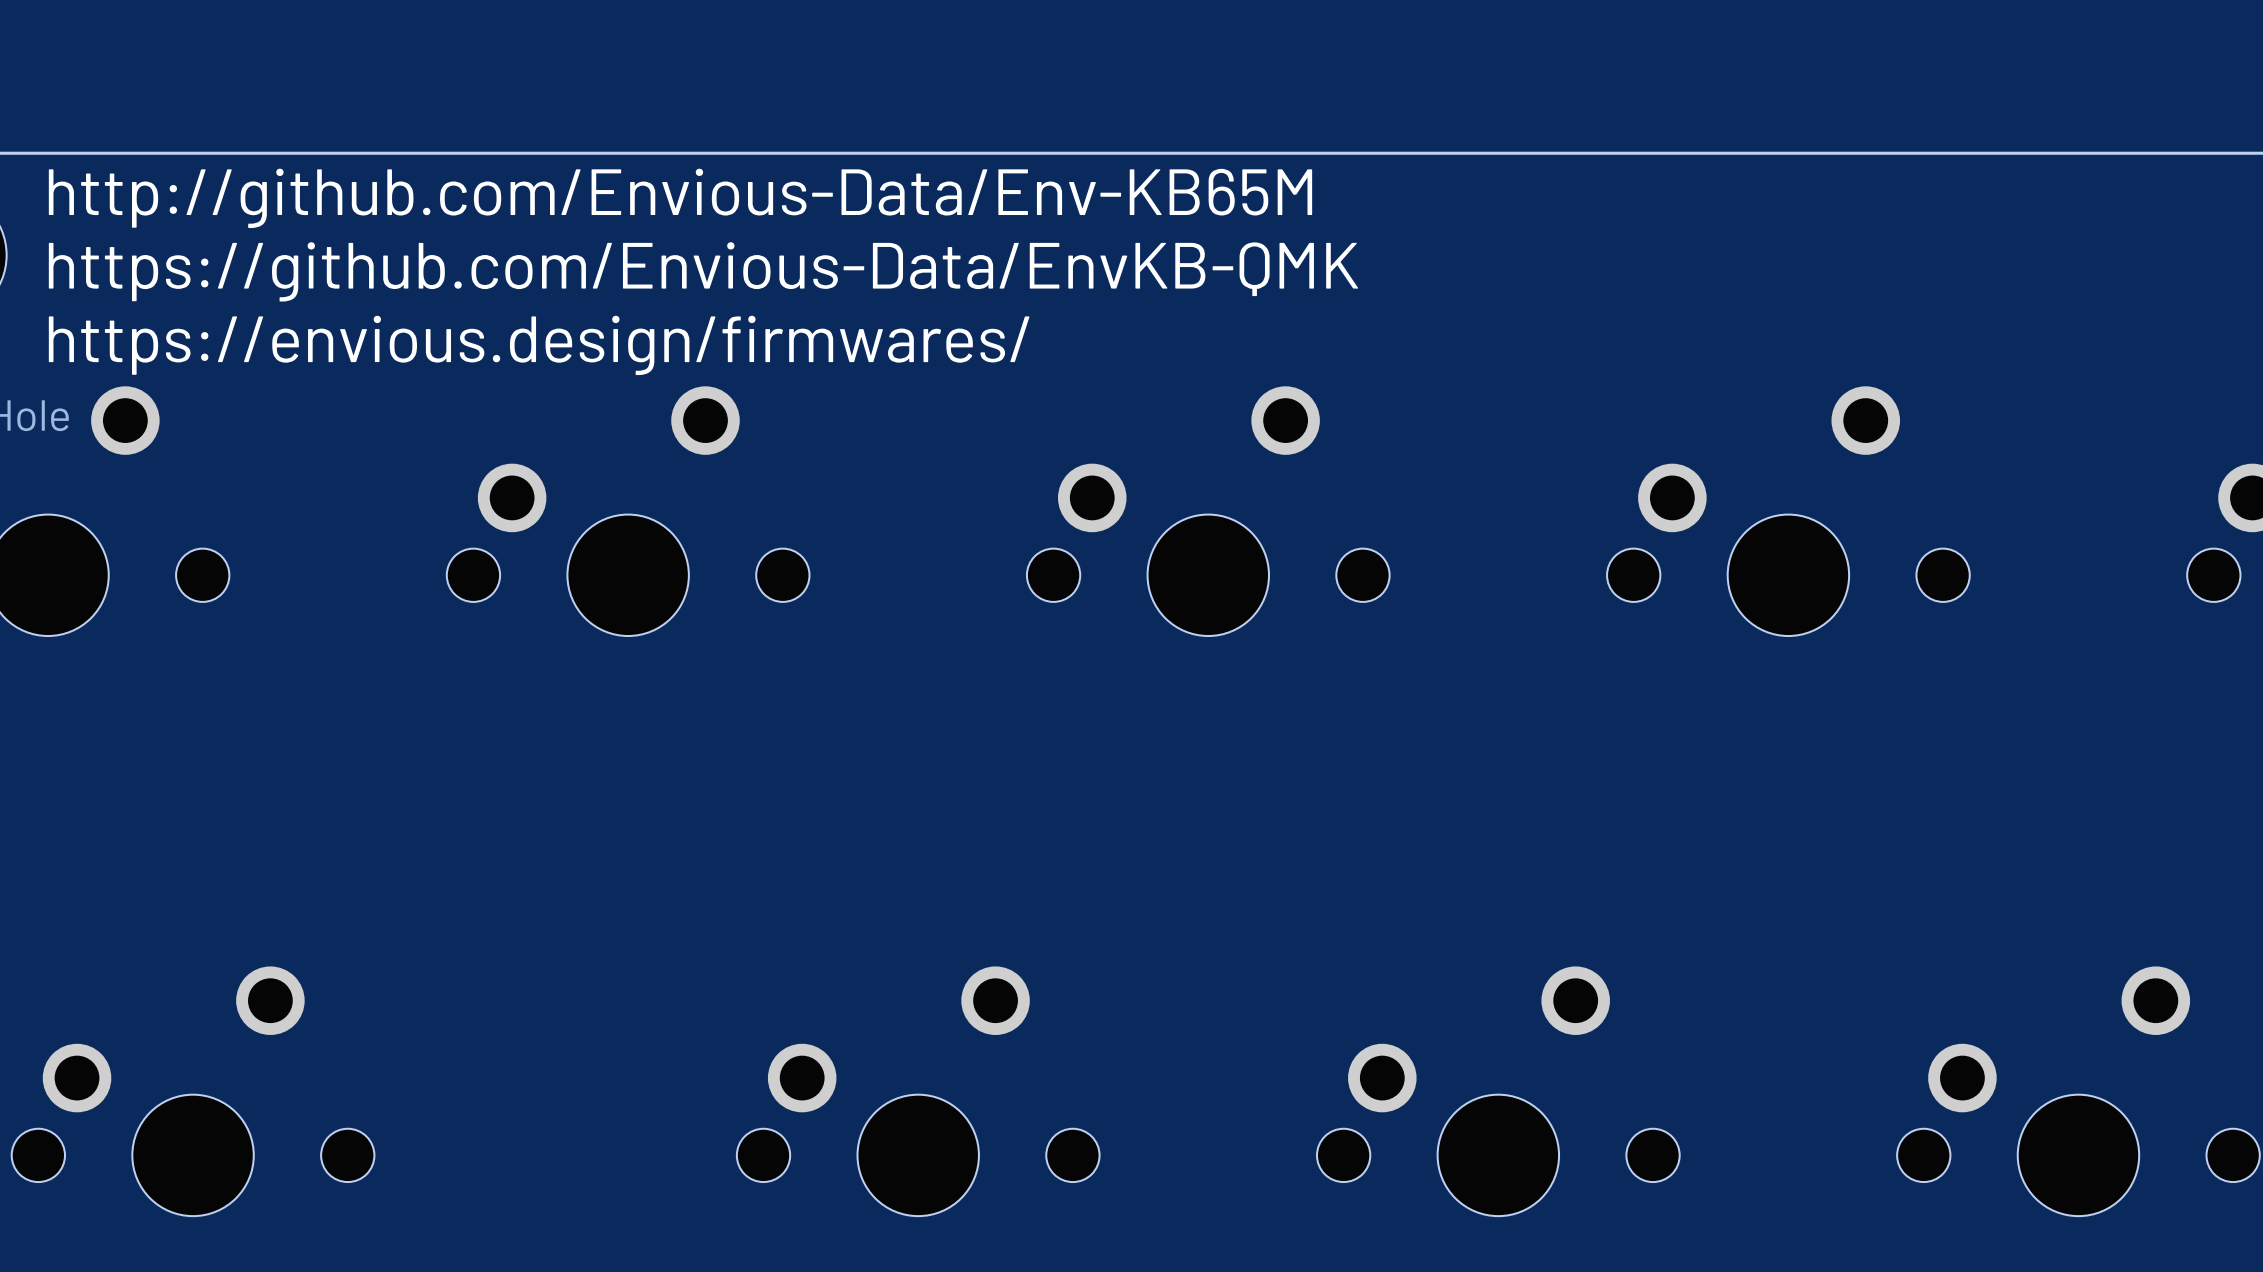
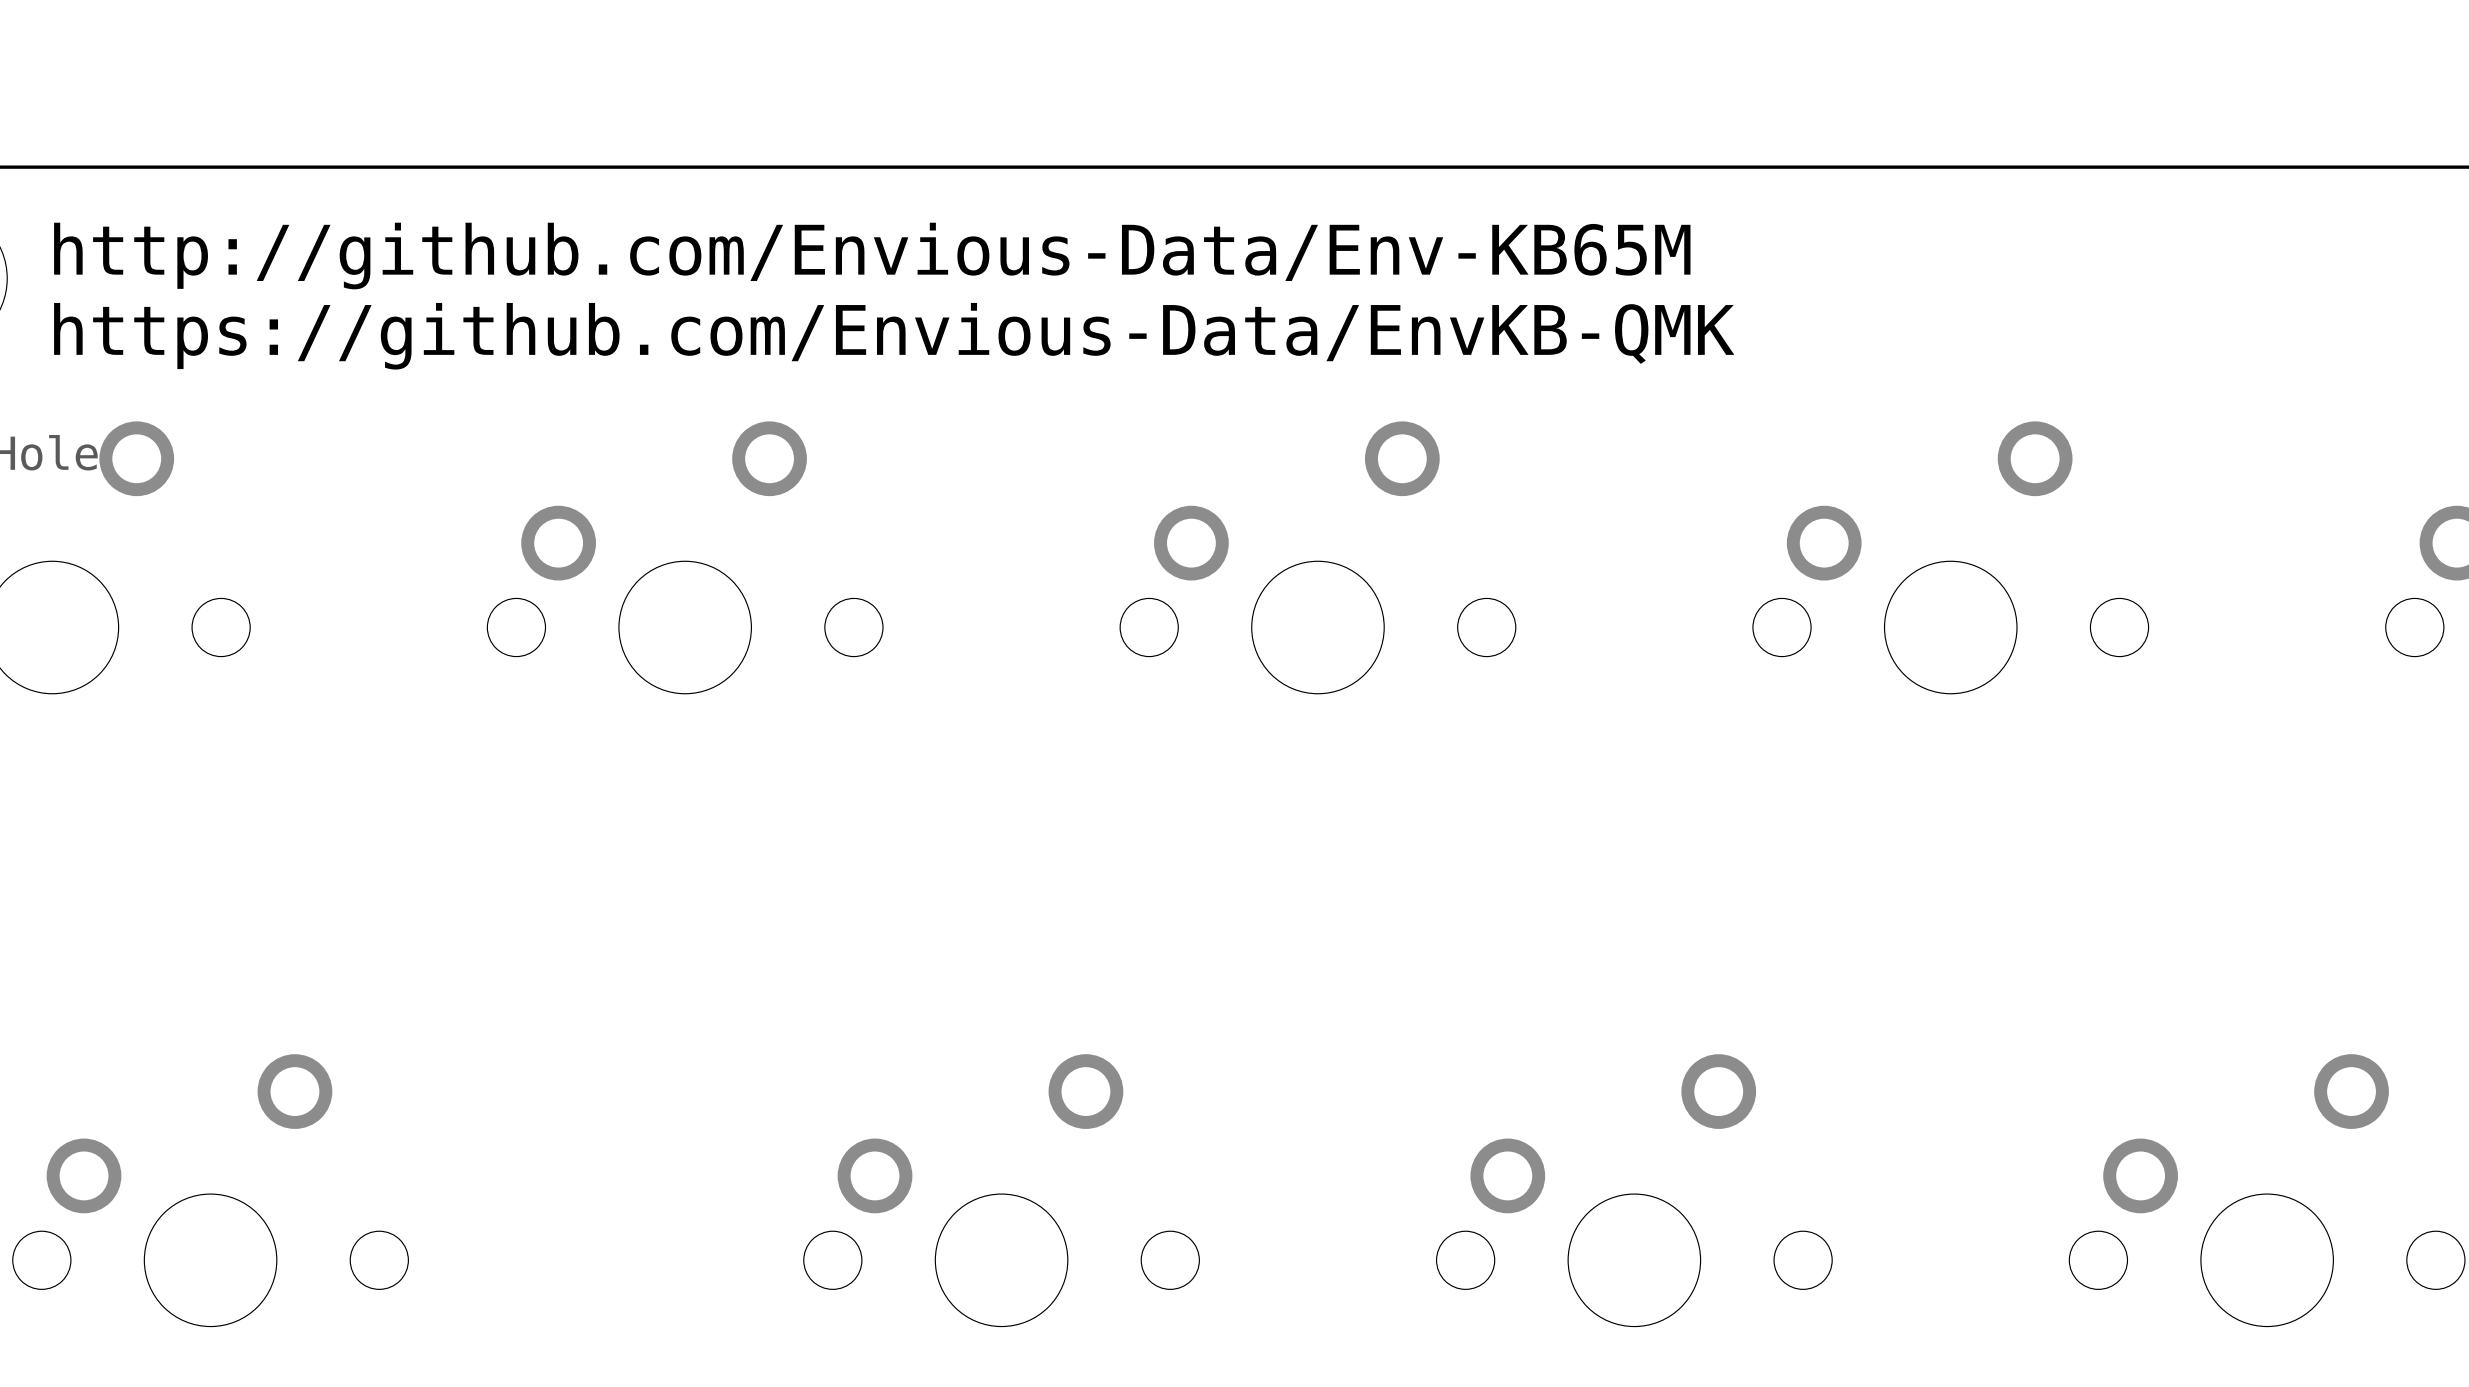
text position: http://github.com/Envious-Data/Env-KB65M (680, 198) -> http://github.com/Envious-Data/Env-KB65M (872, 256)
text position: https://github.com/Envious-Data/EnvKB-QMK (703, 271) -> https://github.com/Envious-Data/EnvKB-QMK (894, 336)
text: https://envious.design/firmwares/ (539, 345) -> none

